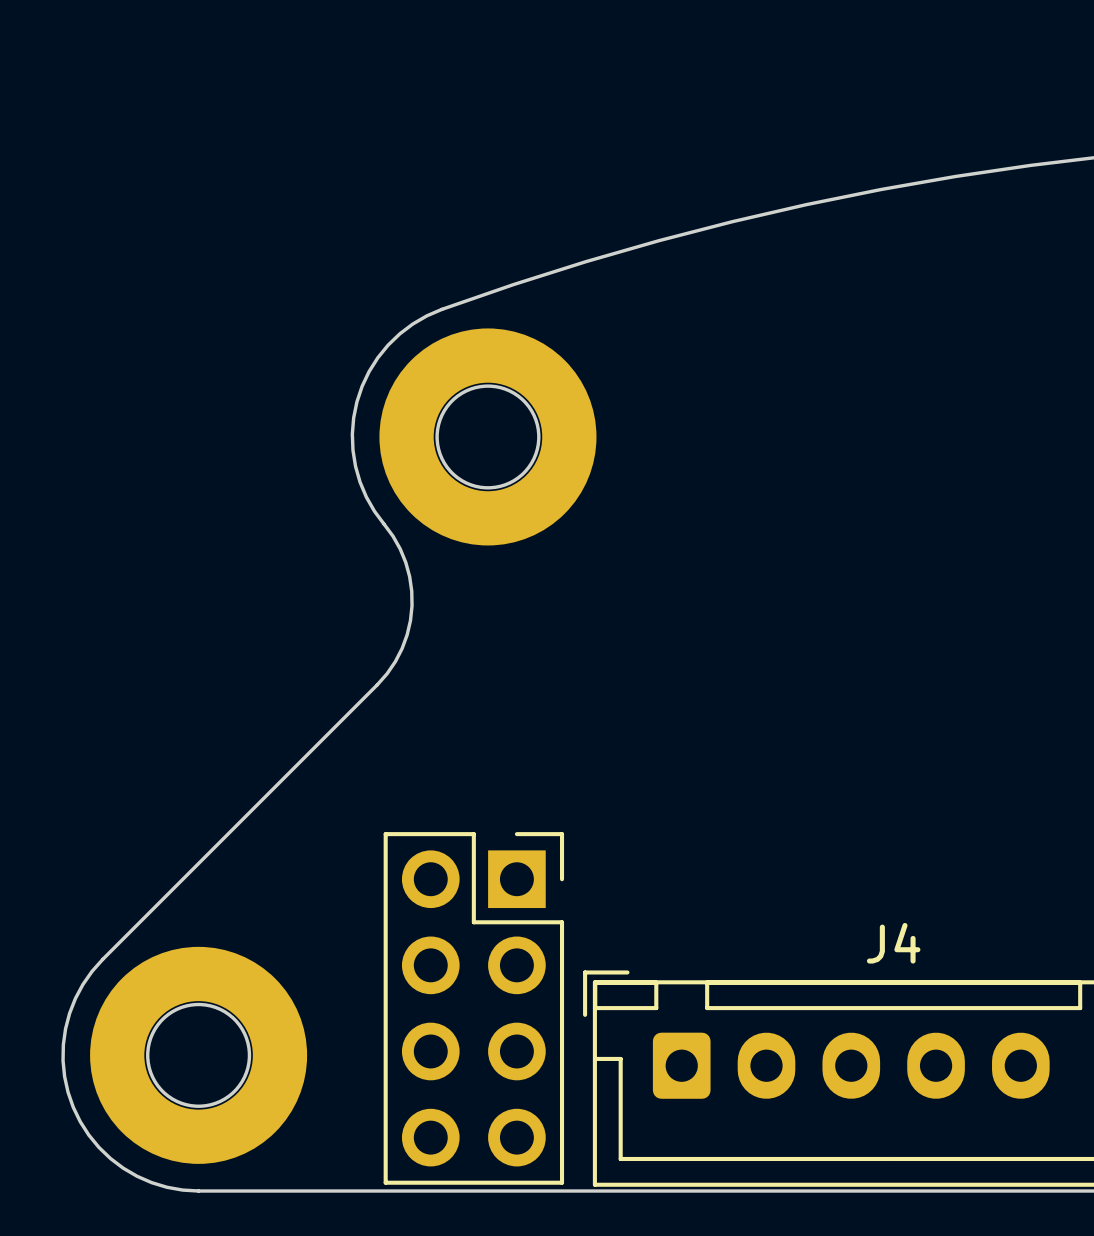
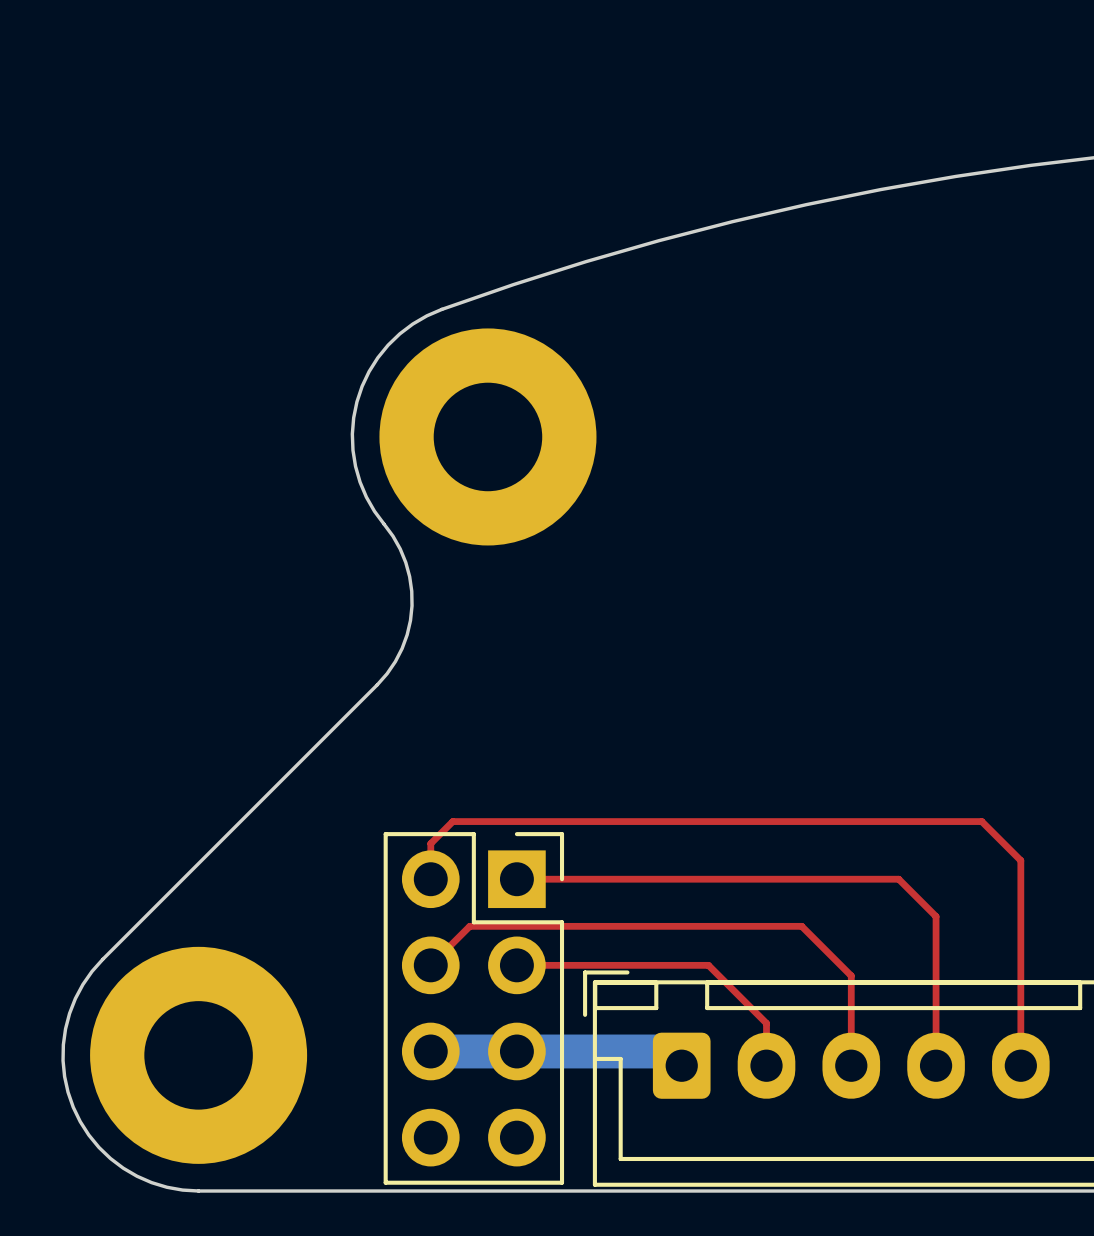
round board edge: [435, 384, 541, 490] -> none
top track: none -> (430, 879) (430, 843) (452, 821) (981, 821) (1020, 860) (1020, 1065)
top track: none -> (516, 879) (898, 879) (936, 916) (936, 1065)
J4 name: J4 (893, 943) -> none
top track: none -> (430, 965) (469, 926) (801, 926) (851, 975) (851, 1065)
top track: none -> (516, 965) (708, 965) (766, 1023) (766, 1065)
round board edge: [146, 1002, 252, 1108] -> none
bottom track: none -> (430, 1051) (667, 1051) (681, 1065)

